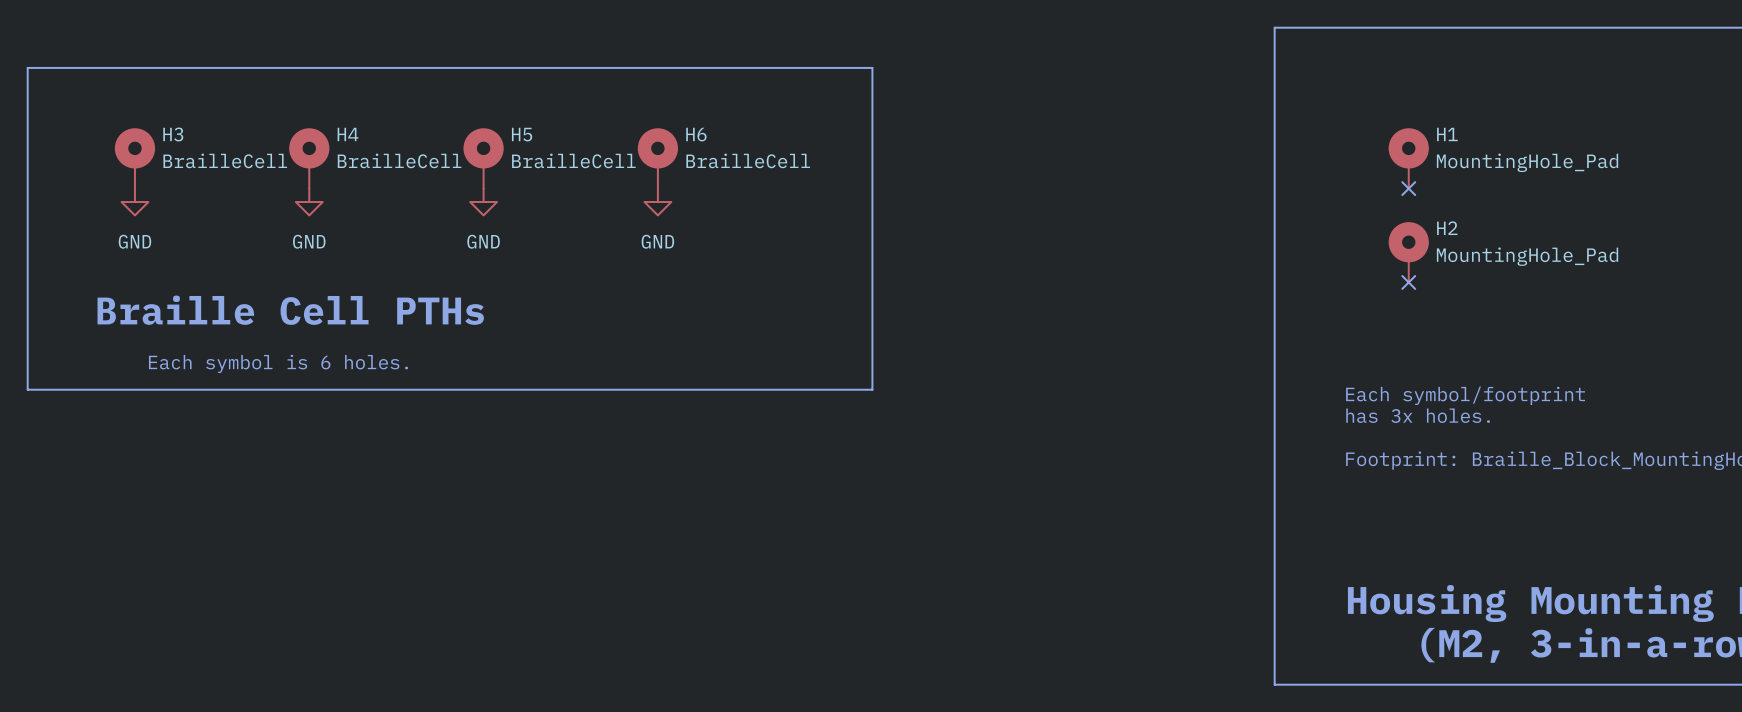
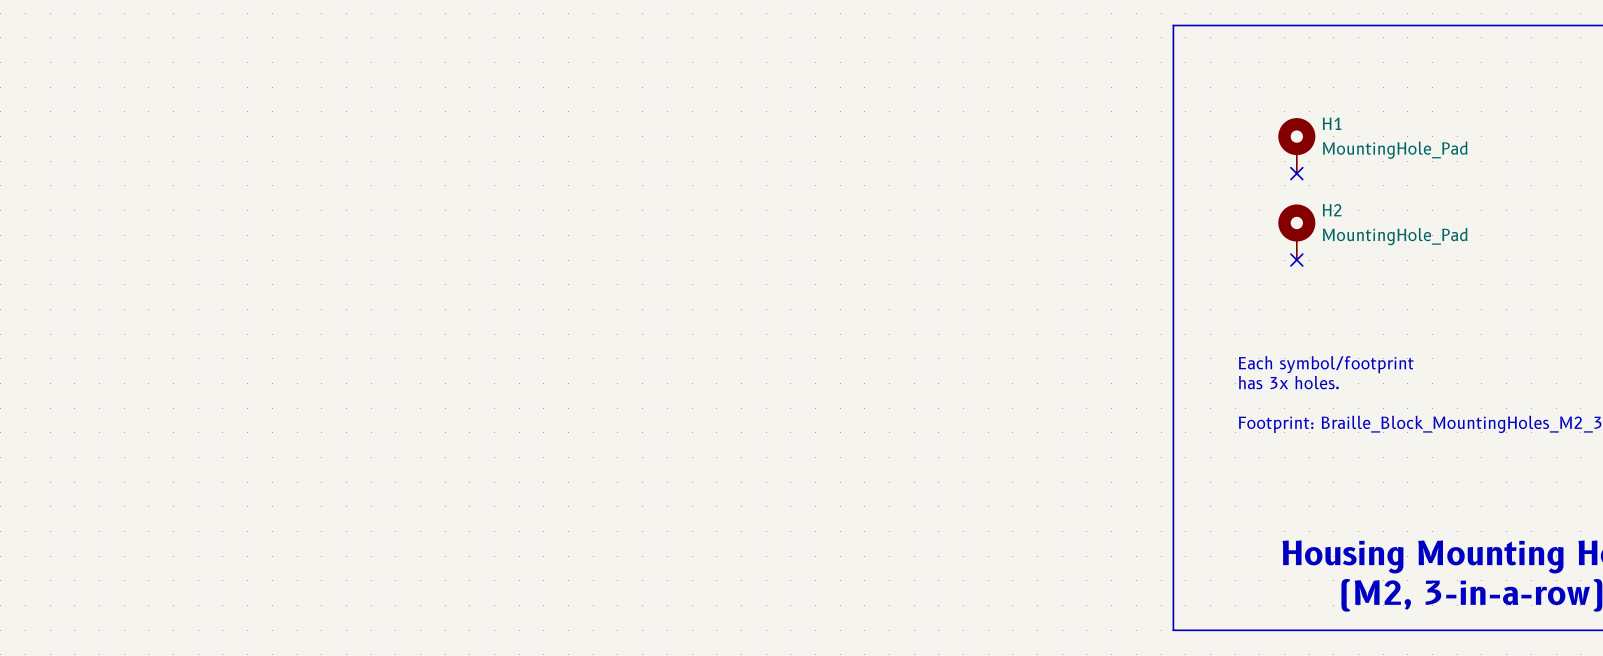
line: (27, 67) (872, 67) (872, 389) (27, 389) (27, 67) -> none
H3: BrailleCell (134, 158) -> none
H4: BrailleCell (309, 158) -> none
H5: BrailleCell (483, 158) -> none
H6: BrailleCell (657, 158) -> none
power symbol: GND (134, 202) -> none
power symbol: GND (309, 202) -> none
power symbol: GND (483, 202) -> none
power symbol: GND (657, 202) -> none
text: Braille Cell PTHs (290, 310) -> none
text: Each symbol is 6 holes. (278, 363) -> none

